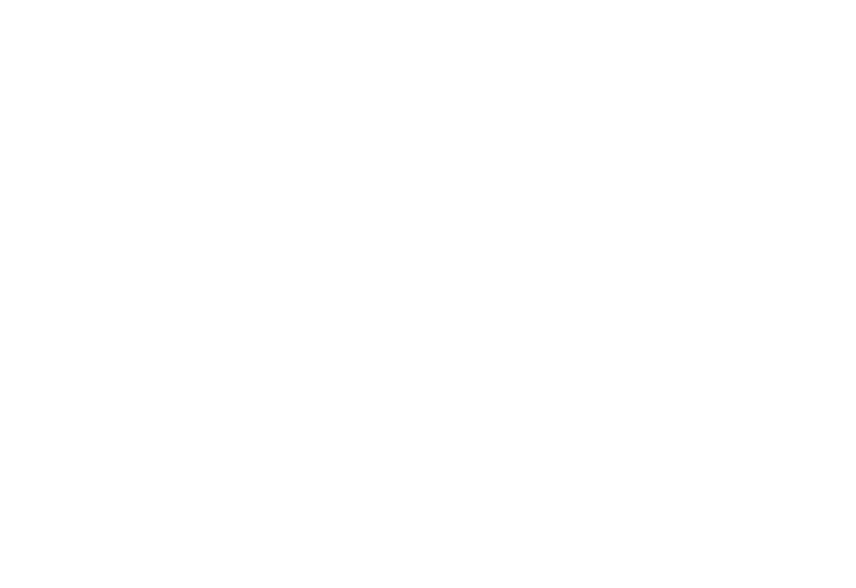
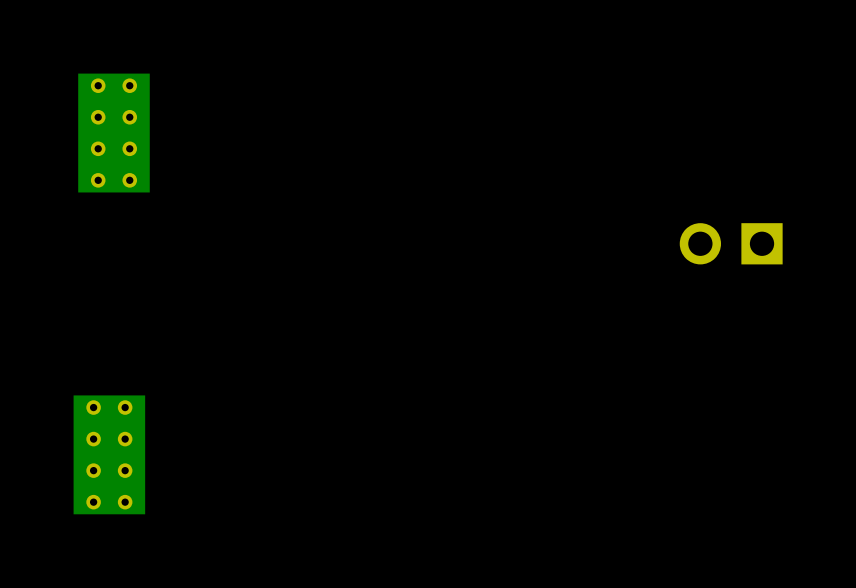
part: none -> (113, 133)
part: none -> (731, 243)
part: none -> (109, 454)

